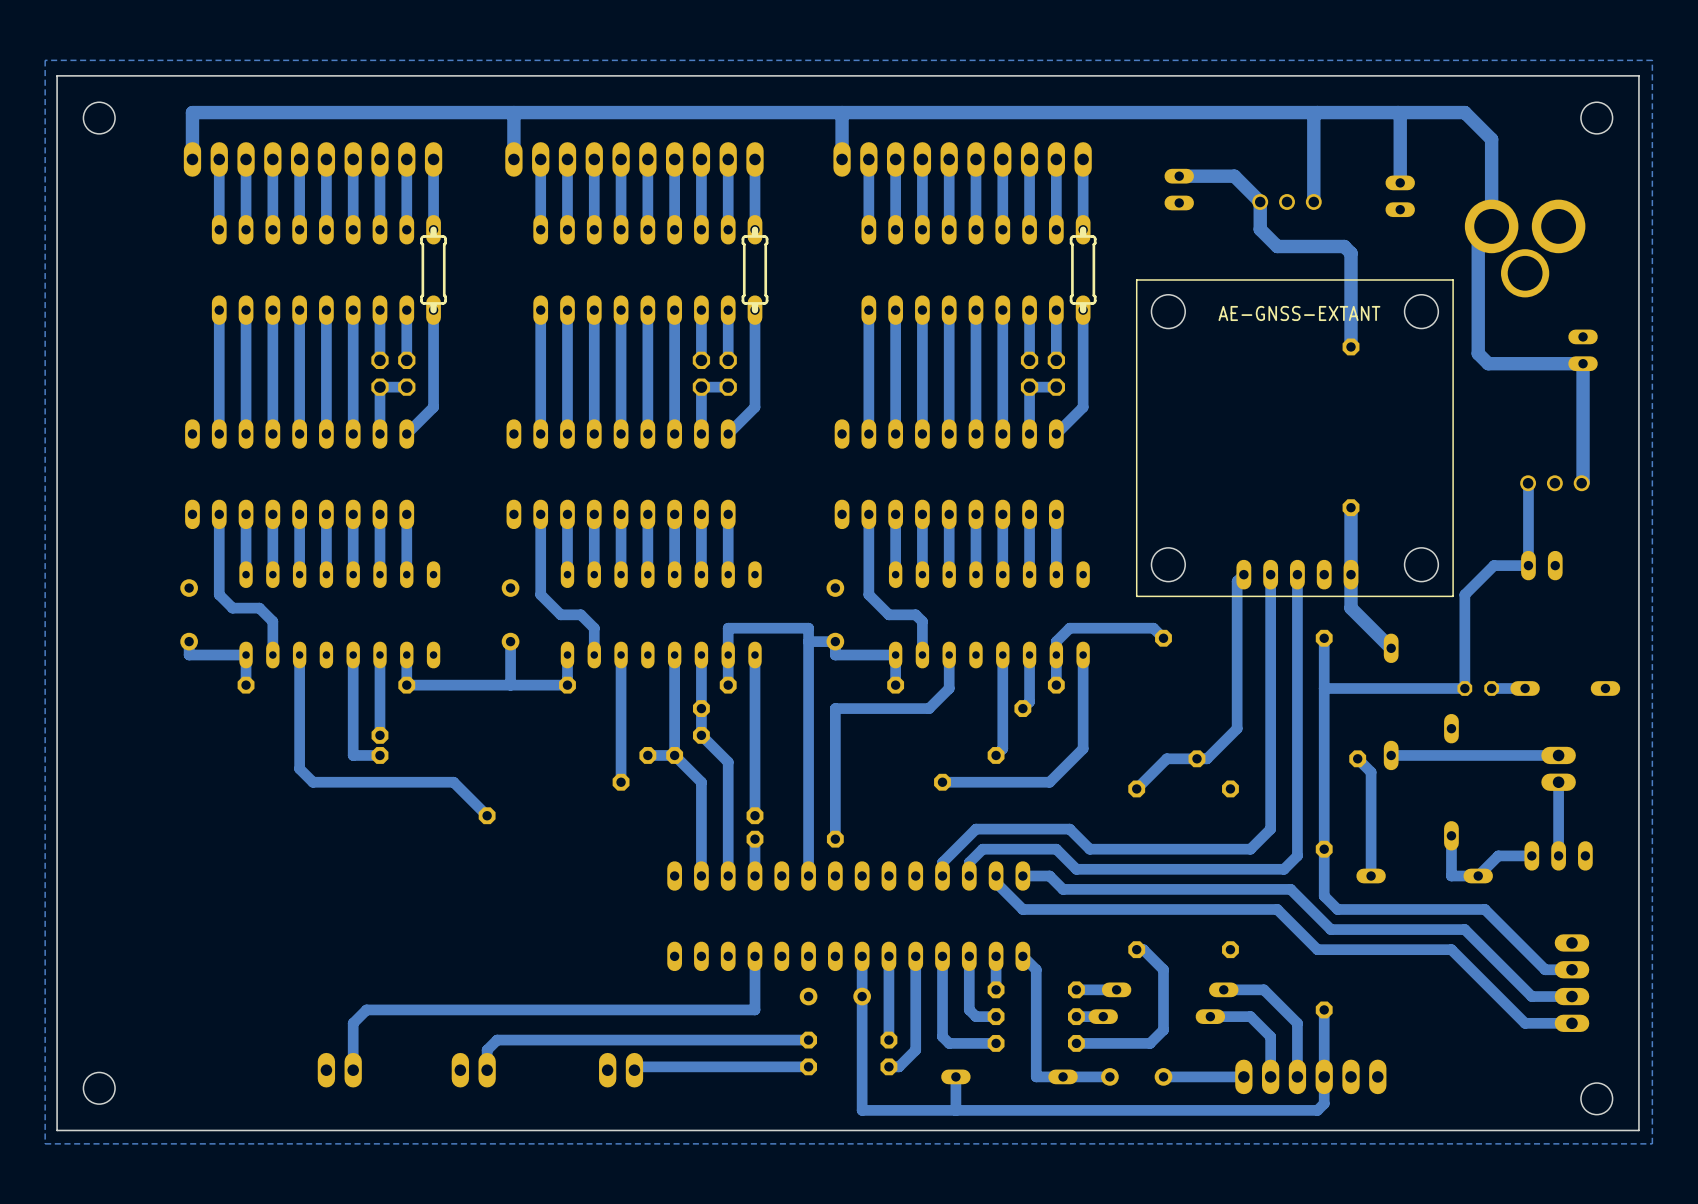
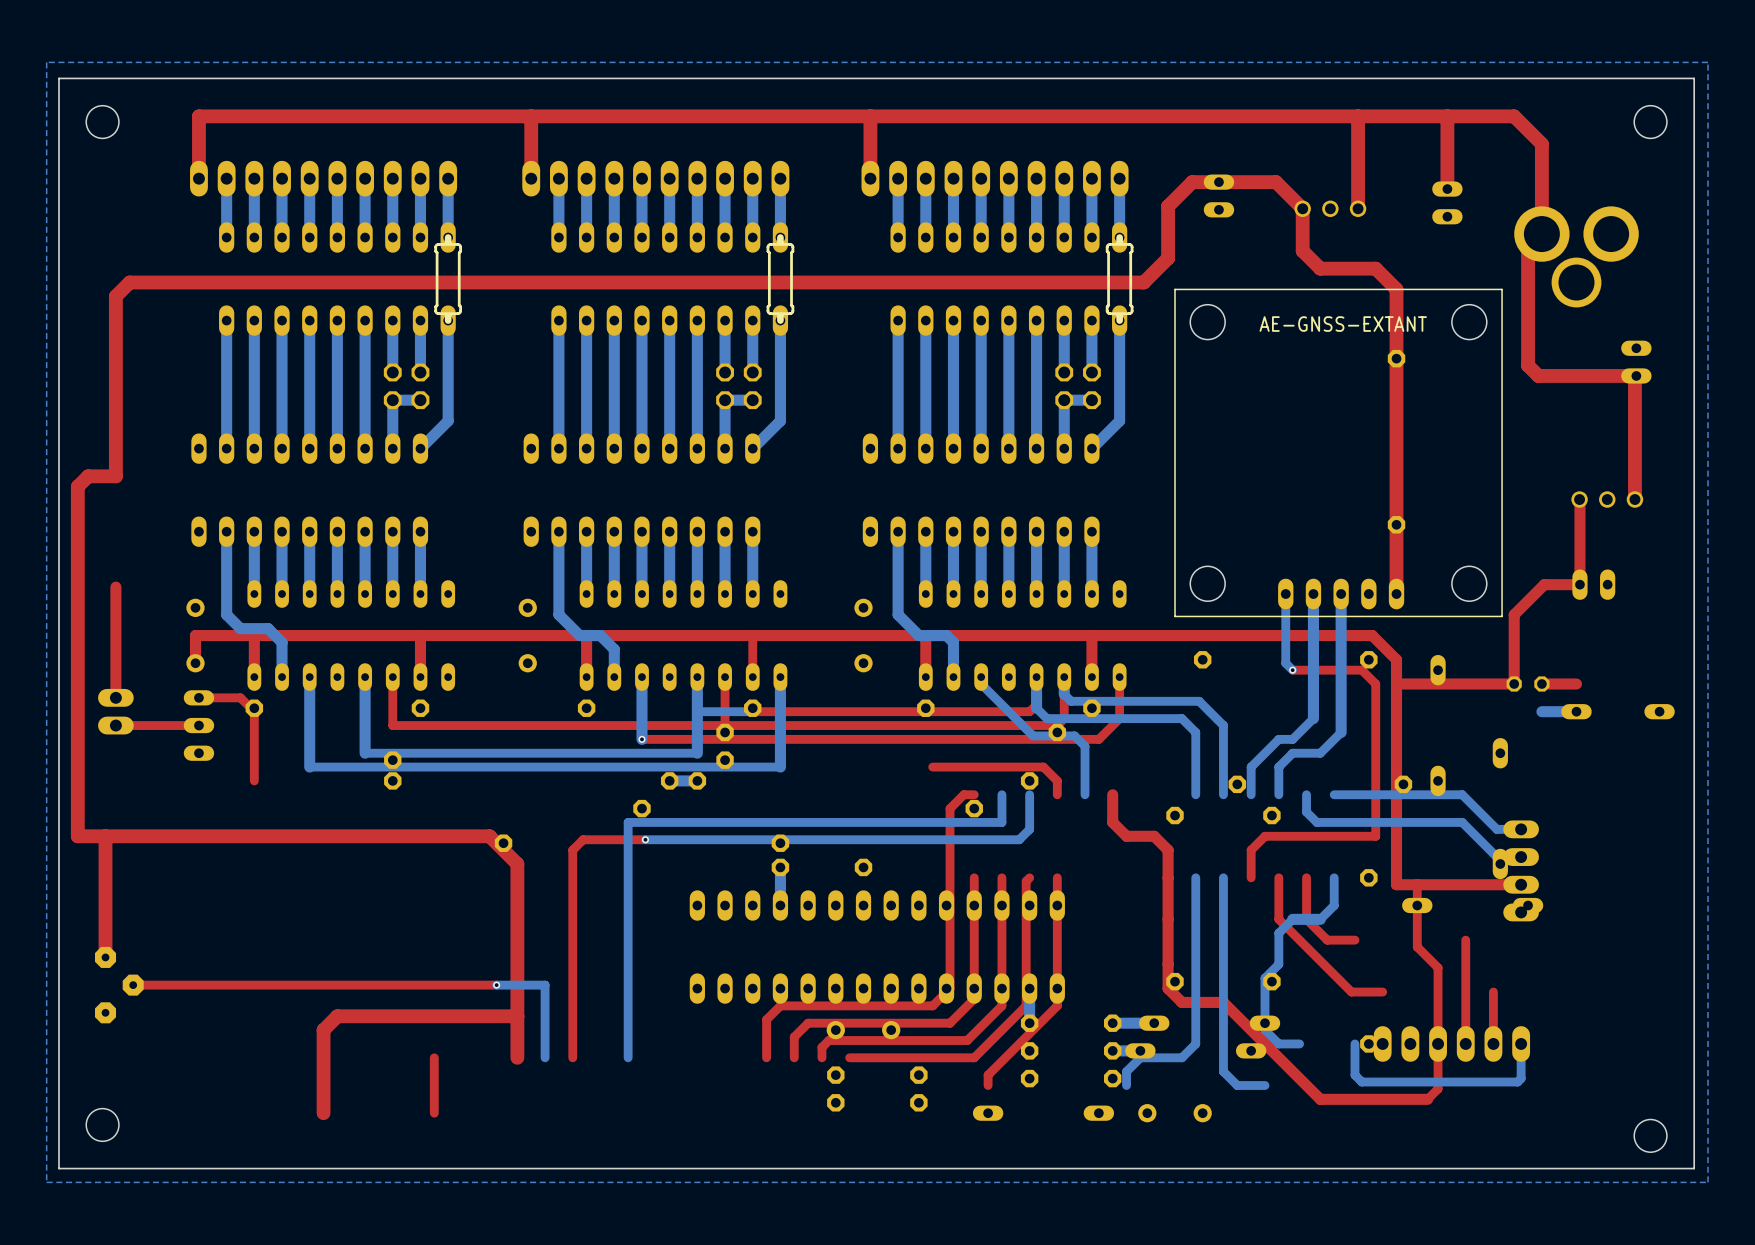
bottom track: (513, 112) (513, 159) -> none
top track: none -> (531, 116) (531, 178)
bottom track: (842, 112) (842, 159) -> none
top track: none -> (870, 116) (870, 178)
top track: none -> (1358, 116) (1358, 208)
bottom track: (1317, 112) (1313, 116) (1313, 201) -> none
bottom track: (1397, 112) (1400, 114) (1400, 182) -> none
top track: none -> (1447, 116) (1447, 189)
part position: (313, 159) -> (323, 178)
part position: (634, 159) -> (655, 178)
part position: (962, 159) -> (995, 178)
bottom track: (192, 166) (192, 112) (1464, 112) (1491, 139) (1491, 226) (1478, 239) (1478, 353) (1488, 363) (1583, 363) (1581, 483) -> none
top track: none -> (198, 178) (198, 116) (1514, 116) (1541, 144) (1541, 234) (1528, 247) (1528, 365) (1538, 375) (1634, 375) (1634, 499)
bottom track: (1179, 176) (1234, 176) (1260, 201) (1260, 229) (1277, 246) (1344, 246) (1351, 253) (1351, 346) -> none
bottom track: (1528, 483) (1528, 565) (1493, 565) (1464, 594) (1464, 688) (1324, 688) -> none
top track: none -> (1579, 499) (1579, 584) (1544, 584) (1514, 614) (1514, 684) (1396, 684)
bottom track: (1351, 507) (1351, 608) (1391, 648) -> none
top track: none -> (115, 587) (115, 697)
bottom track: (1243, 574) (1237, 581) (1237, 728) (1207, 758) (1166, 758) (1136, 788) -> (1285, 594) (1285, 663) (1292, 670)
top track: none -> (1396, 594) (1396, 289) (1375, 268) (1320, 268) (1302, 250) (1302, 208) (1276, 182) (1192, 182) (1168, 206) (1168, 258) (1143, 282) (129, 282) (115, 296) (115, 476) (88, 476) (77, 486) (77, 836) (489, 836) (517, 863) (517, 1057)
top track: none -> (254, 635) (254, 677)
top track: none -> (420, 635) (420, 677)
top track: none -> (586, 635) (586, 677)
top track: none -> (752, 635) (752, 677)
top track: none -> (922, 635) (925, 639) (925, 677)
top track: none -> (1091, 635) (1091, 677)
bottom track: (1163, 638) (1153, 628) (1069, 628) (1056, 641) (1056, 685) -> none
bottom track: (1324, 638) (1324, 896) (1337, 909) (1484, 909) (1545, 969) (1571, 969) -> none
bottom track: (189, 641) (189, 655) (246, 655) (246, 685) -> none
top track: none -> (195, 663) (195, 635) (1372, 635) (1396, 659) (1396, 884) (1521, 884)
bottom track: (510, 641) (510, 685) -> none
bottom track: (808, 641) (835, 641) (835, 655) (895, 655) (895, 685) -> none
top track: none -> (1292, 670) (1361, 670) (1375, 684) (1375, 836) (1265, 836) (1251, 850) (1251, 877)
via: none -> (1292, 670)
bottom track: (379, 655) (379, 735) -> none
bottom track: (567, 655) (567, 685) (406, 685) (406, 655) -> none
bottom track: (701, 655) (701, 735) (728, 762) (728, 876) -> none
top track: none -> (725, 677) (725, 725)
top track: none -> (1036, 677) (1036, 704) (1029, 711) (752, 711)
top track: none -> (1064, 677) (1064, 718) (1057, 725) (392, 725) (392, 677)
bottom track: (1083, 655) (1083, 748) (1049, 782) (942, 782) -> none
top track: none -> (1119, 677) (1119, 718) (1098, 739) (641, 739)
bottom track: (949, 661) (949, 688) (929, 708) (835, 708) (835, 839) -> (981, 684) (1033, 735) (1074, 735) (1085, 746) (1085, 794)
top track: none -> (1576, 684) (1541, 684)
bottom track: (1029, 671) (1029, 701) (1022, 708) -> (1064, 694) (1071, 701) (1199, 701) (1223, 725) (1223, 794)
top track: none -> (198, 697) (240, 697) (254, 711) (254, 780)
bottom track: (728, 685) (728, 628) (808, 628) (808, 876) -> none
bottom track: (1002, 685) (1002, 748) (996, 755) -> (1036, 708) (1046, 718) (1181, 718) (1195, 732) (1195, 794)
part: none -> (115, 711)
bottom track: none -> (752, 711) (697, 711)
part position: (1478, 688) -> (1528, 684)
bottom track: (1270, 695) (1270, 829) (1250, 849) (1089, 849) (1069, 829) (975, 829) (942, 862) (942, 876) -> (1313, 718) (1292, 739) (1278, 739) (1251, 767) (1251, 794)
top track: none -> (198, 725) (115, 725)
part: none -> (198, 725)
bottom track: (1297, 708) (1297, 855) (1284, 869) (1076, 869) (1056, 849) (982, 849) (969, 862) (969, 876) -> (1341, 732) (1320, 753) (1292, 753) (1278, 767) (1278, 794)
bottom track: (621, 715) (621, 782) -> none
via: none -> (641, 739)
bottom track: (353, 728) (353, 755) (379, 755) -> (365, 753) (697, 753)
bottom track: (674, 728) (674, 755) (701, 782) (701, 876) -> none
bottom track: (299, 742) (299, 768) (313, 782) (453, 782) (487, 815) -> (309, 767) (780, 767)
bottom track: (755, 742) (755, 815) -> none
top track: none -> (932, 767) (1043, 767) (1057, 780) (1057, 794)
bottom track: (1558, 755) (1391, 755) -> none
bottom track: (1357, 758) (1371, 772) (1371, 876) -> none
top track: none -> (974, 794) (963, 794) (950, 808) (950, 988) (932, 1005) (780, 1005) (766, 1019) (766, 1057)
bottom track: none -> (1001, 794) (1001, 822) (628, 822) (628, 1057)
bottom track: none -> (1029, 794) (1029, 829) (1019, 839) (645, 839)
top track: none -> (1112, 794) (1112, 822) (1126, 836) (1154, 836) (1168, 850) (1168, 988) (1181, 1002) (1223, 1002) (1320, 1099) (1427, 1099) (1438, 1088) (1438, 967) (1417, 947) (1417, 884)
bottom track: none -> (1306, 794) (1306, 812) (1316, 822) (1462, 822) (1496, 857) (1521, 857)
bottom track: none -> (1334, 794) (1462, 794) (1496, 829) (1521, 829)
part: (1558, 768) -> none
bottom track: (1558, 782) (1558, 855) -> none
top track: none -> (105, 836) (105, 957)
top track: none -> (645, 839) (583, 839) (572, 850) (572, 1057)
via: none -> (645, 839)
bottom track: (1451, 835) (1451, 876) (1478, 876) (1498, 855) (1531, 855) -> none
top track: none -> (974, 877) (974, 998) (950, 1023) (808, 1023) (794, 1037) (794, 1057)
top track: none -> (1001, 877) (1001, 1005) (967, 1040) (828, 1040) (821, 1047) (821, 1057)
top track: none -> (1029, 877) (1026, 881) (1026, 1005) (974, 1057) (849, 1057)
top track: none -> (1057, 877) (1057, 1005) (988, 1075) (988, 1085)
bottom track: none -> (1195, 877) (1195, 1043) (1181, 1057) (1140, 1057) (1126, 1071) (1126, 1085)
bottom track: none -> (1223, 877) (1223, 1071) (1237, 1085) (1265, 1085)
top track: none -> (1278, 877) (1278, 919) (1351, 992) (1382, 992)
top track: none -> (1306, 877) (1306, 919) (1327, 940) (1354, 940)
part: (1558, 855) -> none
bottom track: (996, 876) (996, 882) (1022, 909) (1277, 909) (1317, 949) (1451, 949) (1525, 1023) (1571, 1023) -> none
bottom track: (1022, 876) (1049, 876) (1063, 889) (1250, 889) -> (1299, 1043) (1278, 1043) (1265, 1030) (1265, 978) (1278, 964) (1278, 933) (1292, 919)
bottom track: (1277, 889) (1290, 889) (1330, 929) (1464, 929) (1531, 996) (1571, 996) -> (1320, 919) (1334, 905) (1334, 877)
top track: none -> (1465, 940) (1465, 1043)
bottom track: (1136, 949) (1143, 949) (1163, 969) (1163, 1030) (1150, 1043) (1076, 1043) -> none
part: none -> (119, 985)
bottom track: none -> (496, 985) (545, 985) (545, 1057)
top track: none -> (496, 985) (133, 985)
via: none -> (496, 985)
bottom track: (755, 956) (755, 1009) (366, 1009) (353, 1023) (353, 1070) -> none
bottom track: (862, 956) (862, 1110) (1317, 1110) (1324, 1103) (1324, 1009) -> none
bottom track: (888, 956) (888, 1040) -> none
bottom track: (915, 956) (915, 1050) (898, 1066) (888, 1066) -> none
bottom track: (942, 956) (942, 1036) (949, 1043) (996, 1043) -> none
bottom track: (969, 956) (969, 1009) (975, 1016) (996, 1016) -> none
bottom track: (1022, 956) (1036, 969) (1036, 1076) (1109, 1076) -> none
top track: none -> (1493, 992) (1493, 1043)
top track: none -> (517, 1016) (337, 1016) (323, 1030) (323, 1113)
part position: (1571, 983) -> (1521, 870)
bottom track: (1223, 989) (1263, 989) (1297, 1023) (1297, 1076) -> none
bottom track: none -> (1521, 1043) (1521, 1078) (1517, 1082) (1361, 1082) (1354, 1075) (1354, 1043)
bottom track: (1210, 1016) (1250, 1016) (1270, 1036) (1270, 1076) -> none
top track: none -> (434, 1057) (434, 1113)
bottom track: (808, 1040) (497, 1040) (487, 1050) (487, 1070) -> none
bottom track: (808, 1066) (637, 1066) (634, 1070) -> none
part: (339, 1070) -> none
part: (473, 1070) -> none
part: (621, 1070) -> none
bottom track: (955, 1076) (955, 1110) -> none
bottom track: (1243, 1076) (1163, 1076) -> none
part position: (1310, 1076) -> (1451, 1043)

